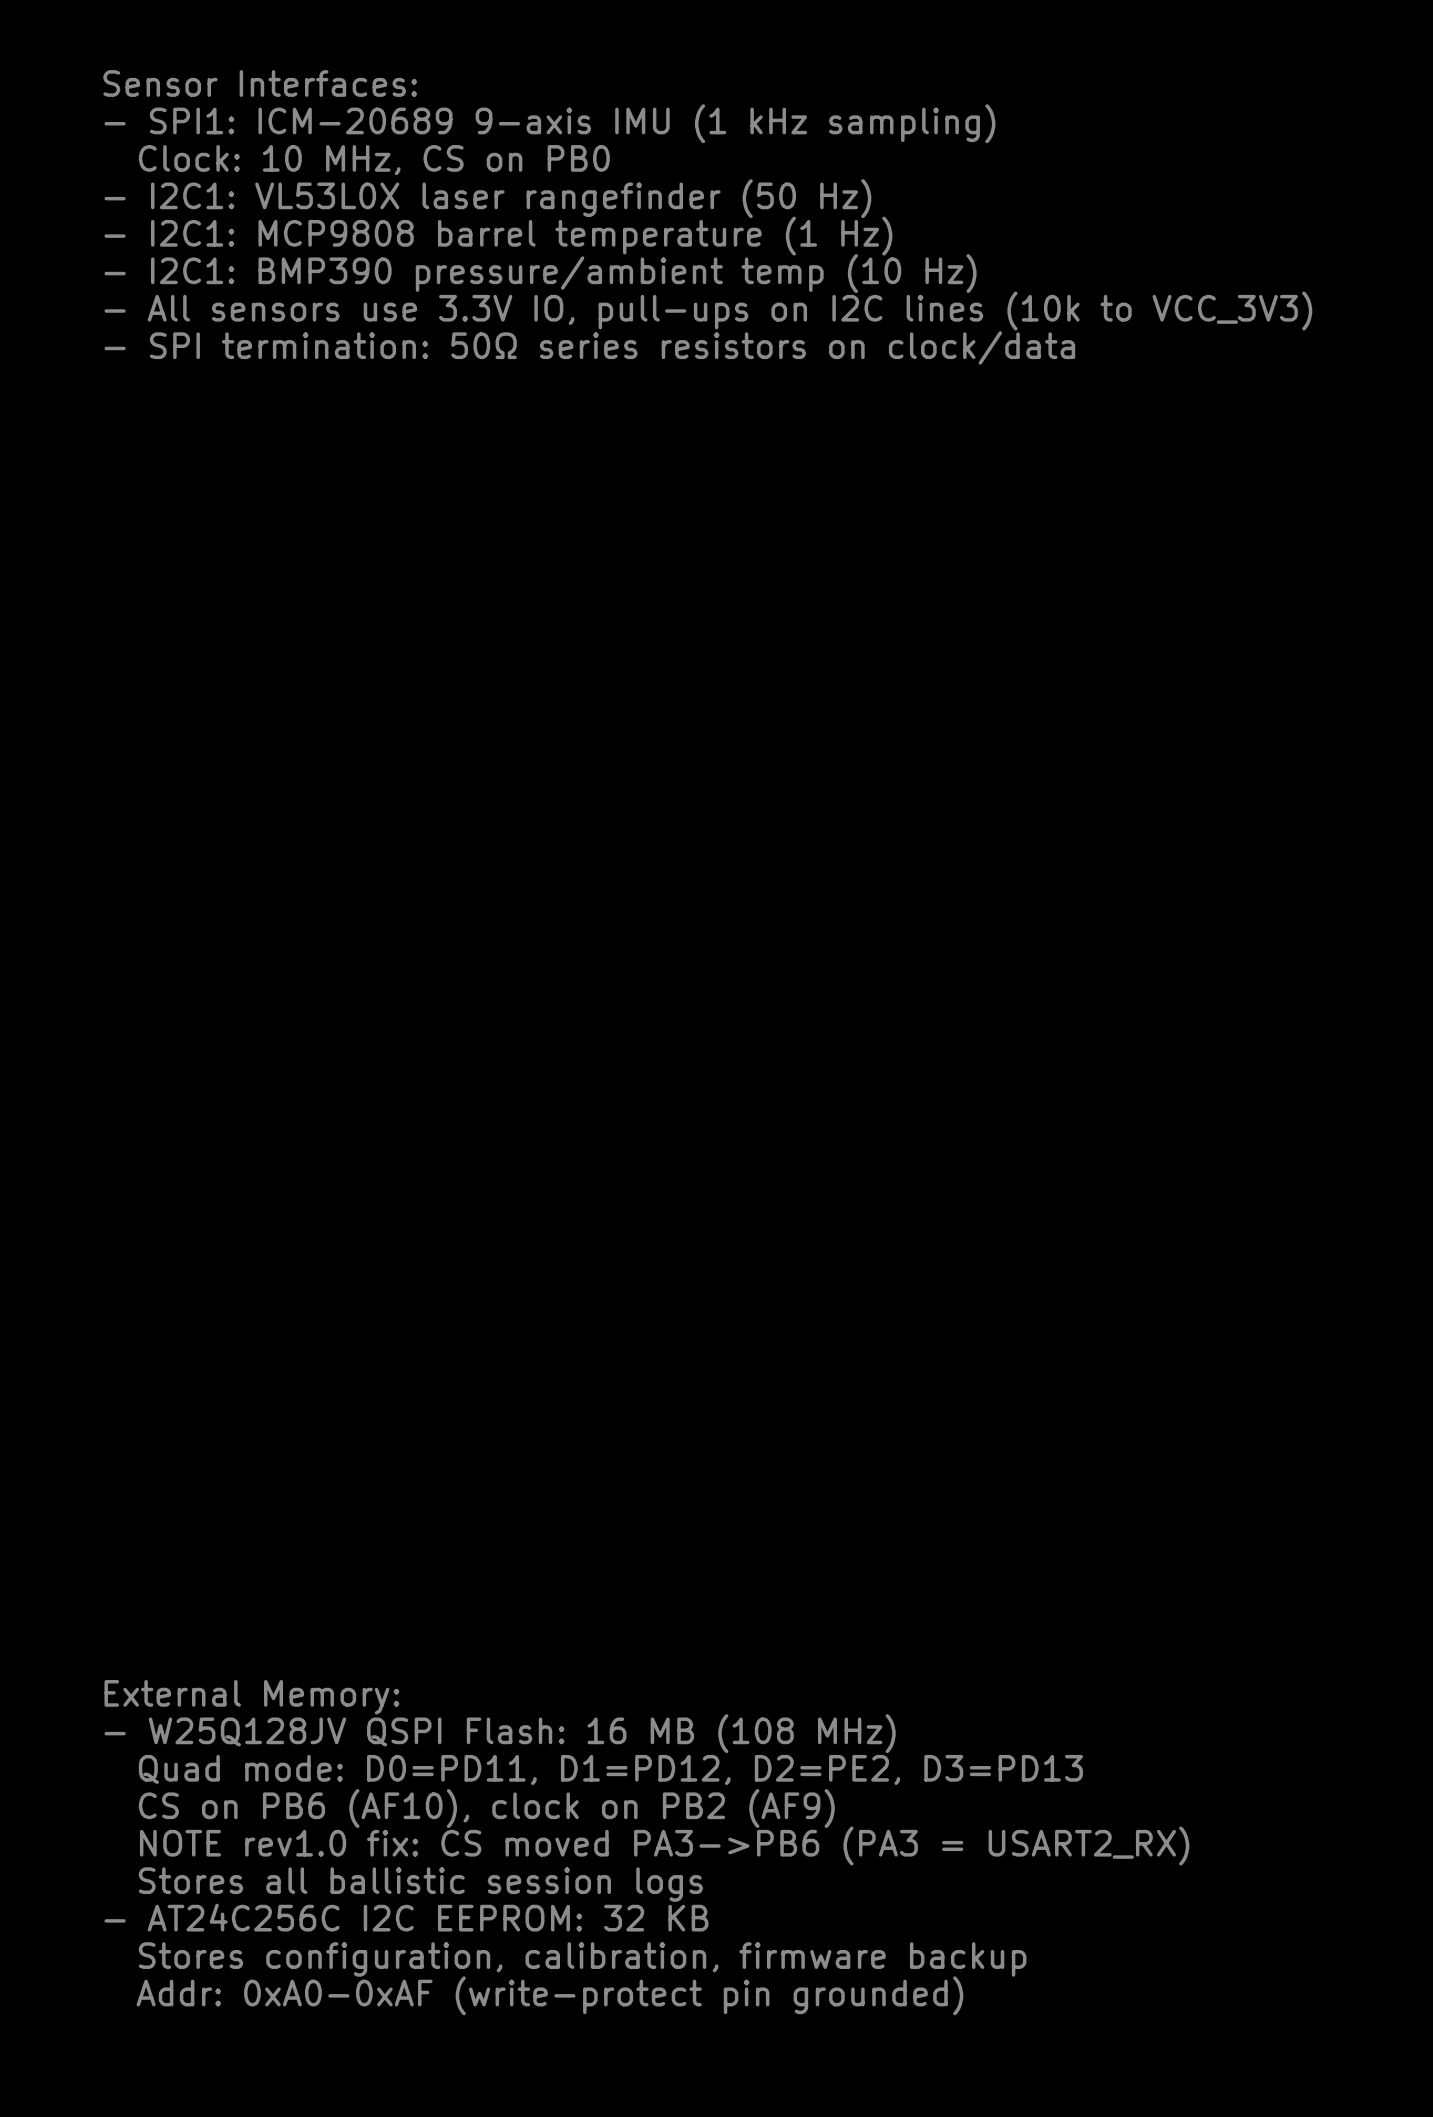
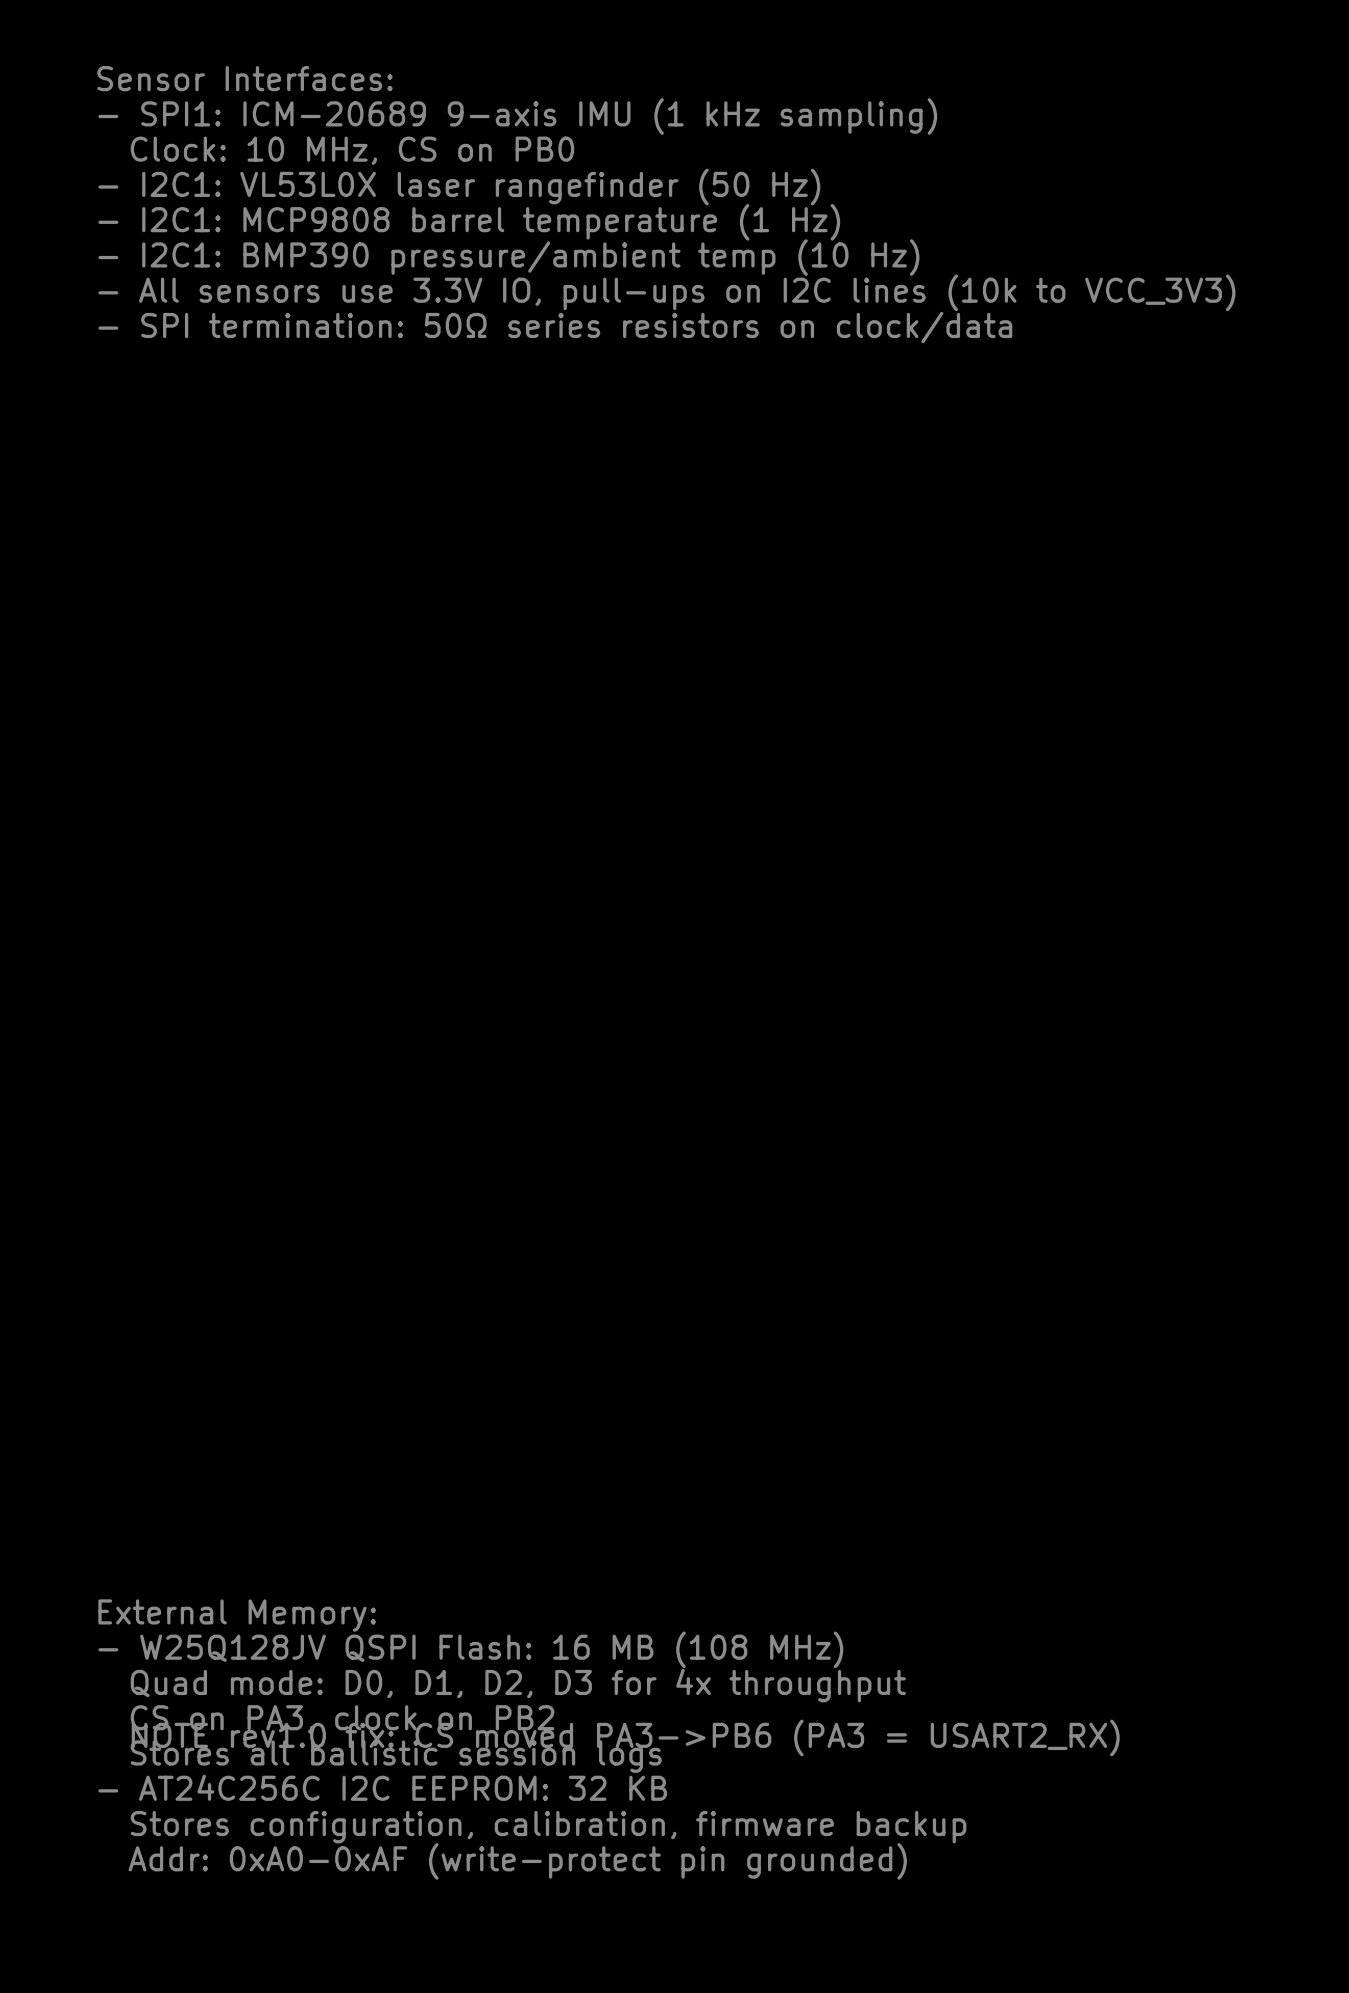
text position: External Memory: (251, 1697) -> External Memory: (237, 1615)
text position: - W25Q128JV QSPI Flash: 16 MB (108 MHz) (500, 1733) -> - W25Q128JV QSPI Flash: 16 MB (108 MHz) (470, 1649)
text: Quad mode: D0=PD11, D1=PD12, D2=PE2, D3=PD13 (610, 1769) -> none
text: none -> Quad mode: D0, D1, D2, D3 for 4x throughput (518, 1685)
text: CS on PB6 (AF10), clock on PB2 (AF9) (486, 1808) -> CS on PA3, clock on PB2 (342, 1719)
text position: Stores all ballistic session logs (420, 1884) -> Stores all ballistic session logs (396, 1756)
text position: - AT24C256C I2C EEPROM: 32 KB (406, 1917) -> - AT24C256C I2C EEPROM: 32 KB (382, 1787)
text position: Stores configuration, calibration, firmware backup (582, 1959) -> Stores configuration, calibration, firmware backup (548, 1827)
text position: Addr: 0xA0-0xAF (write-protect pin grounded) (549, 1995) -> Addr: 0xA0-0xAF (write-protect pin grounded) (517, 1861)

